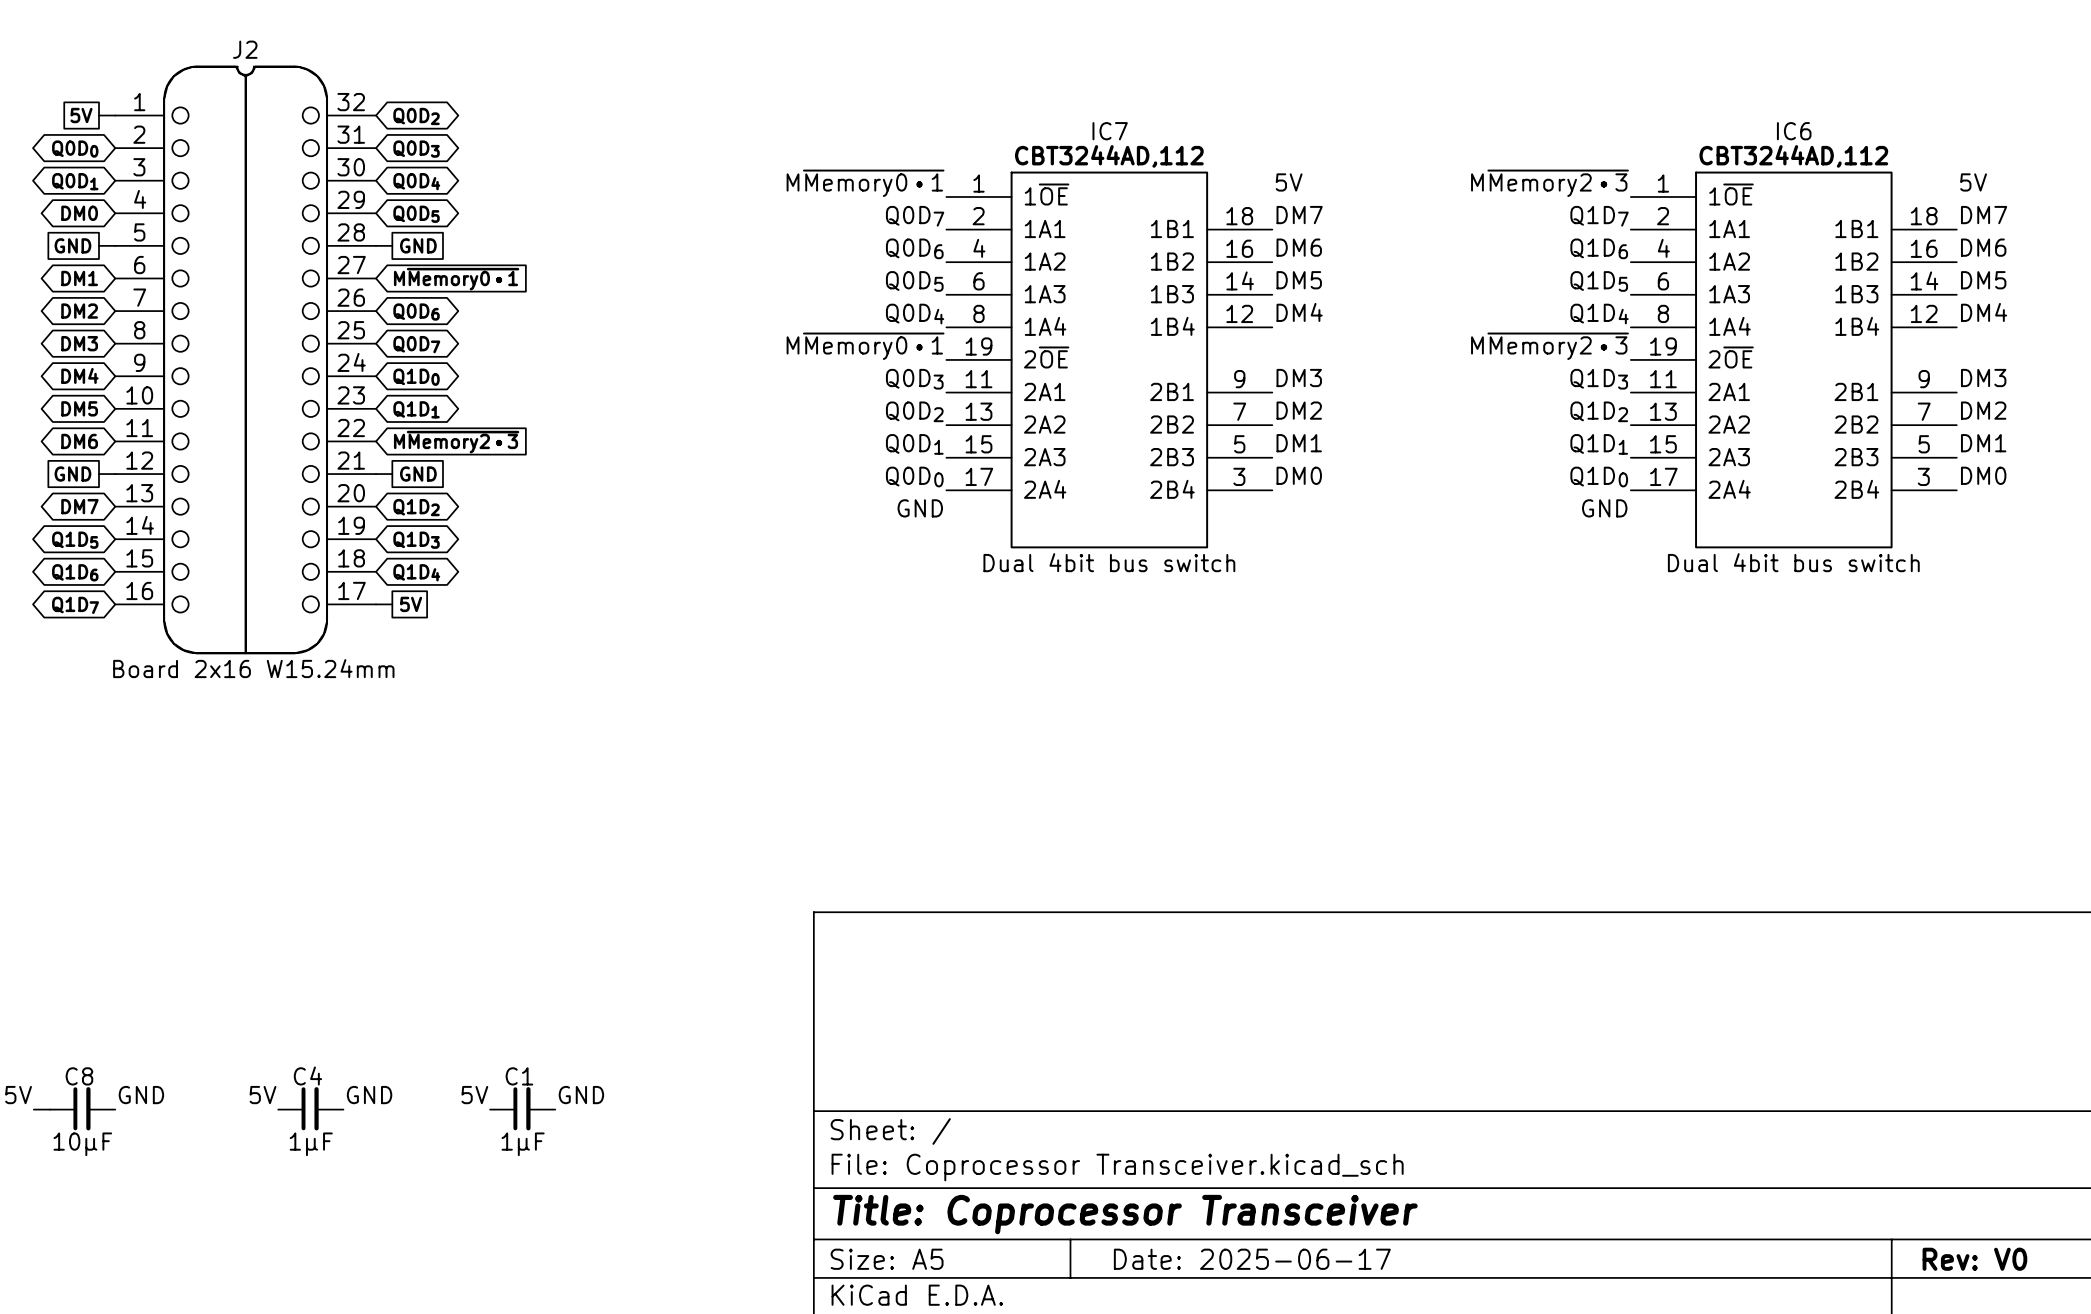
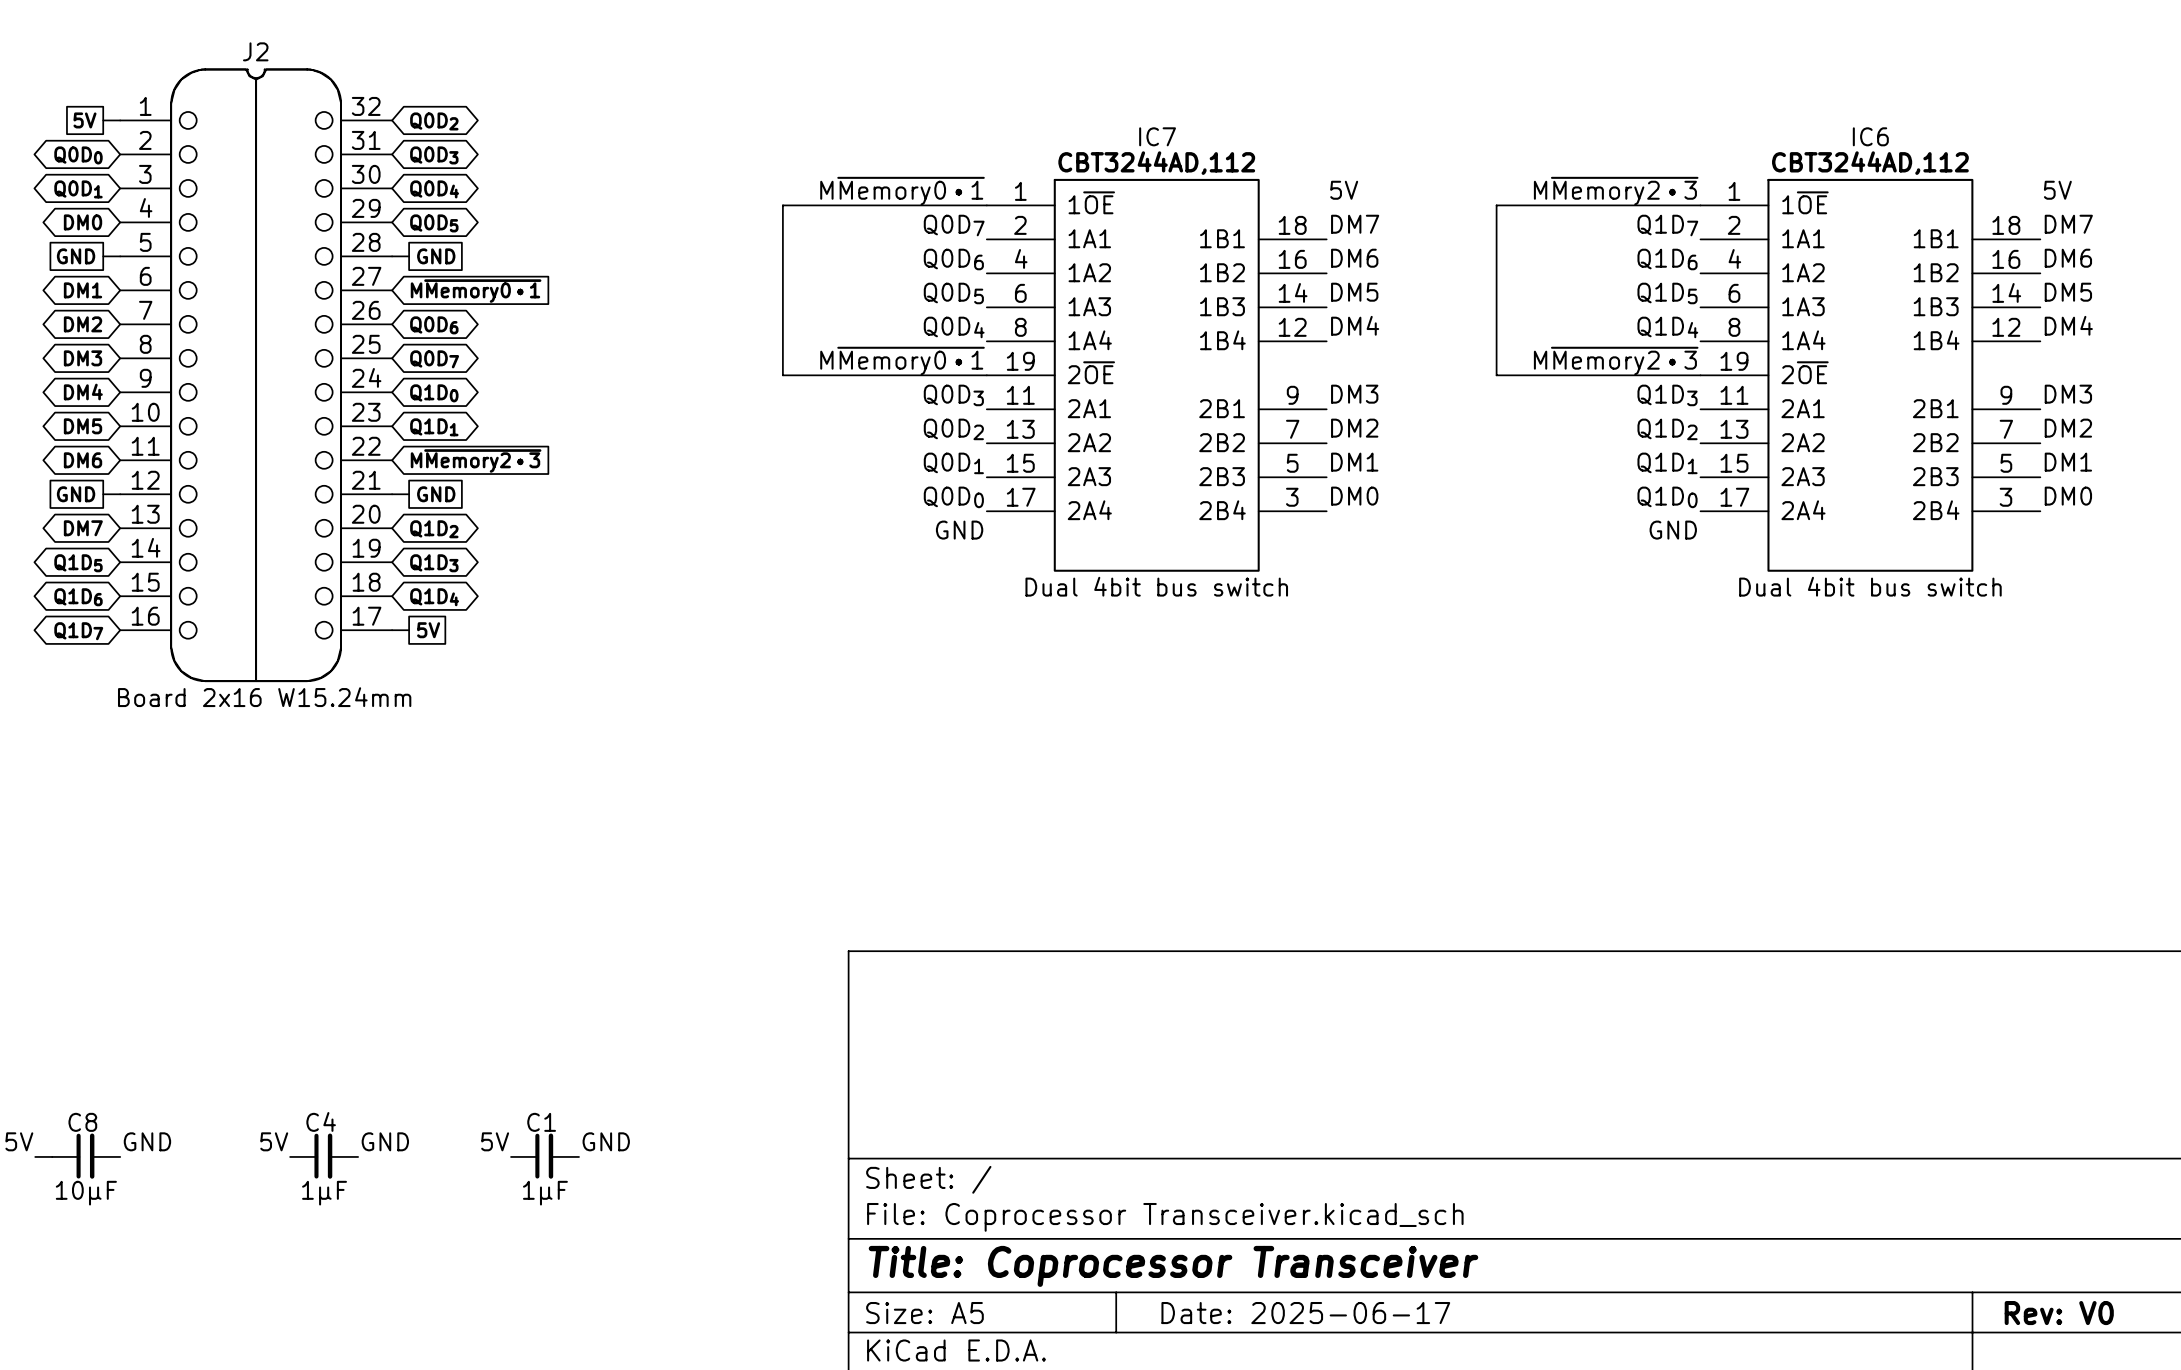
wire: none -> (986, 205) (782, 205) (782, 375) (986, 375)
wire: none -> (1700, 205) (1496, 205) (1496, 375) (1700, 375)

